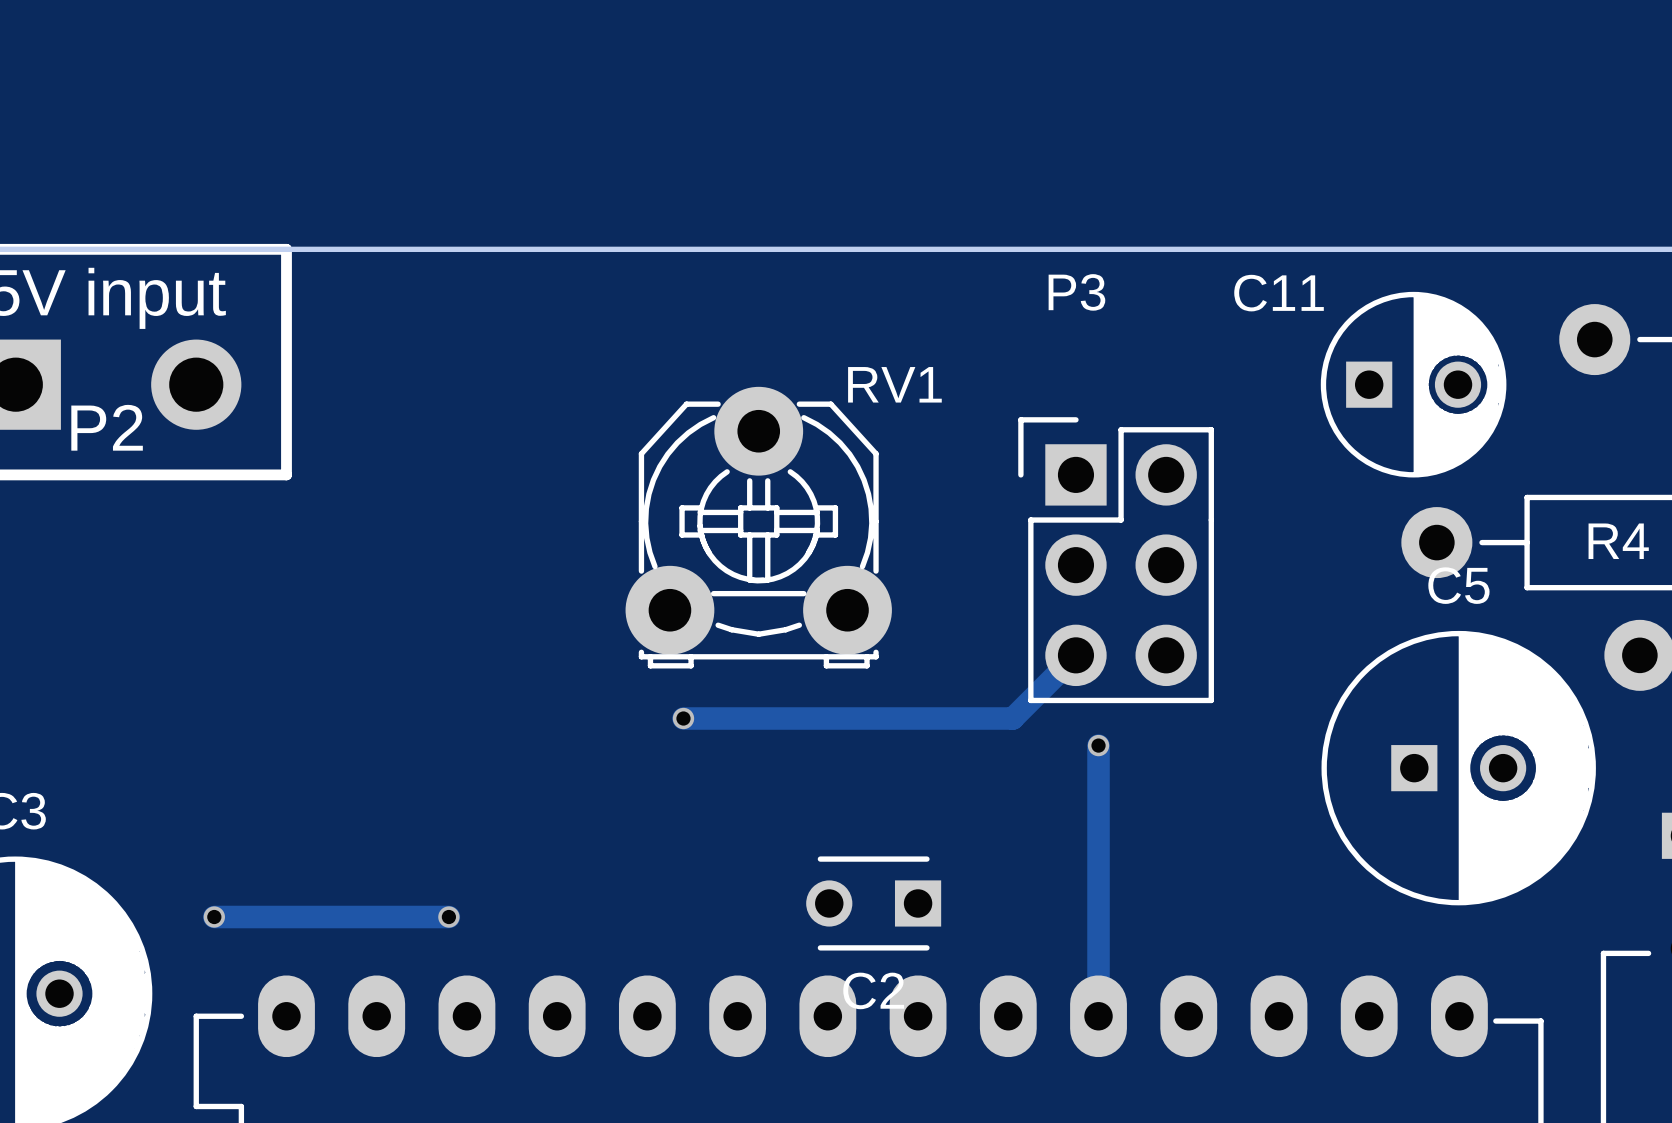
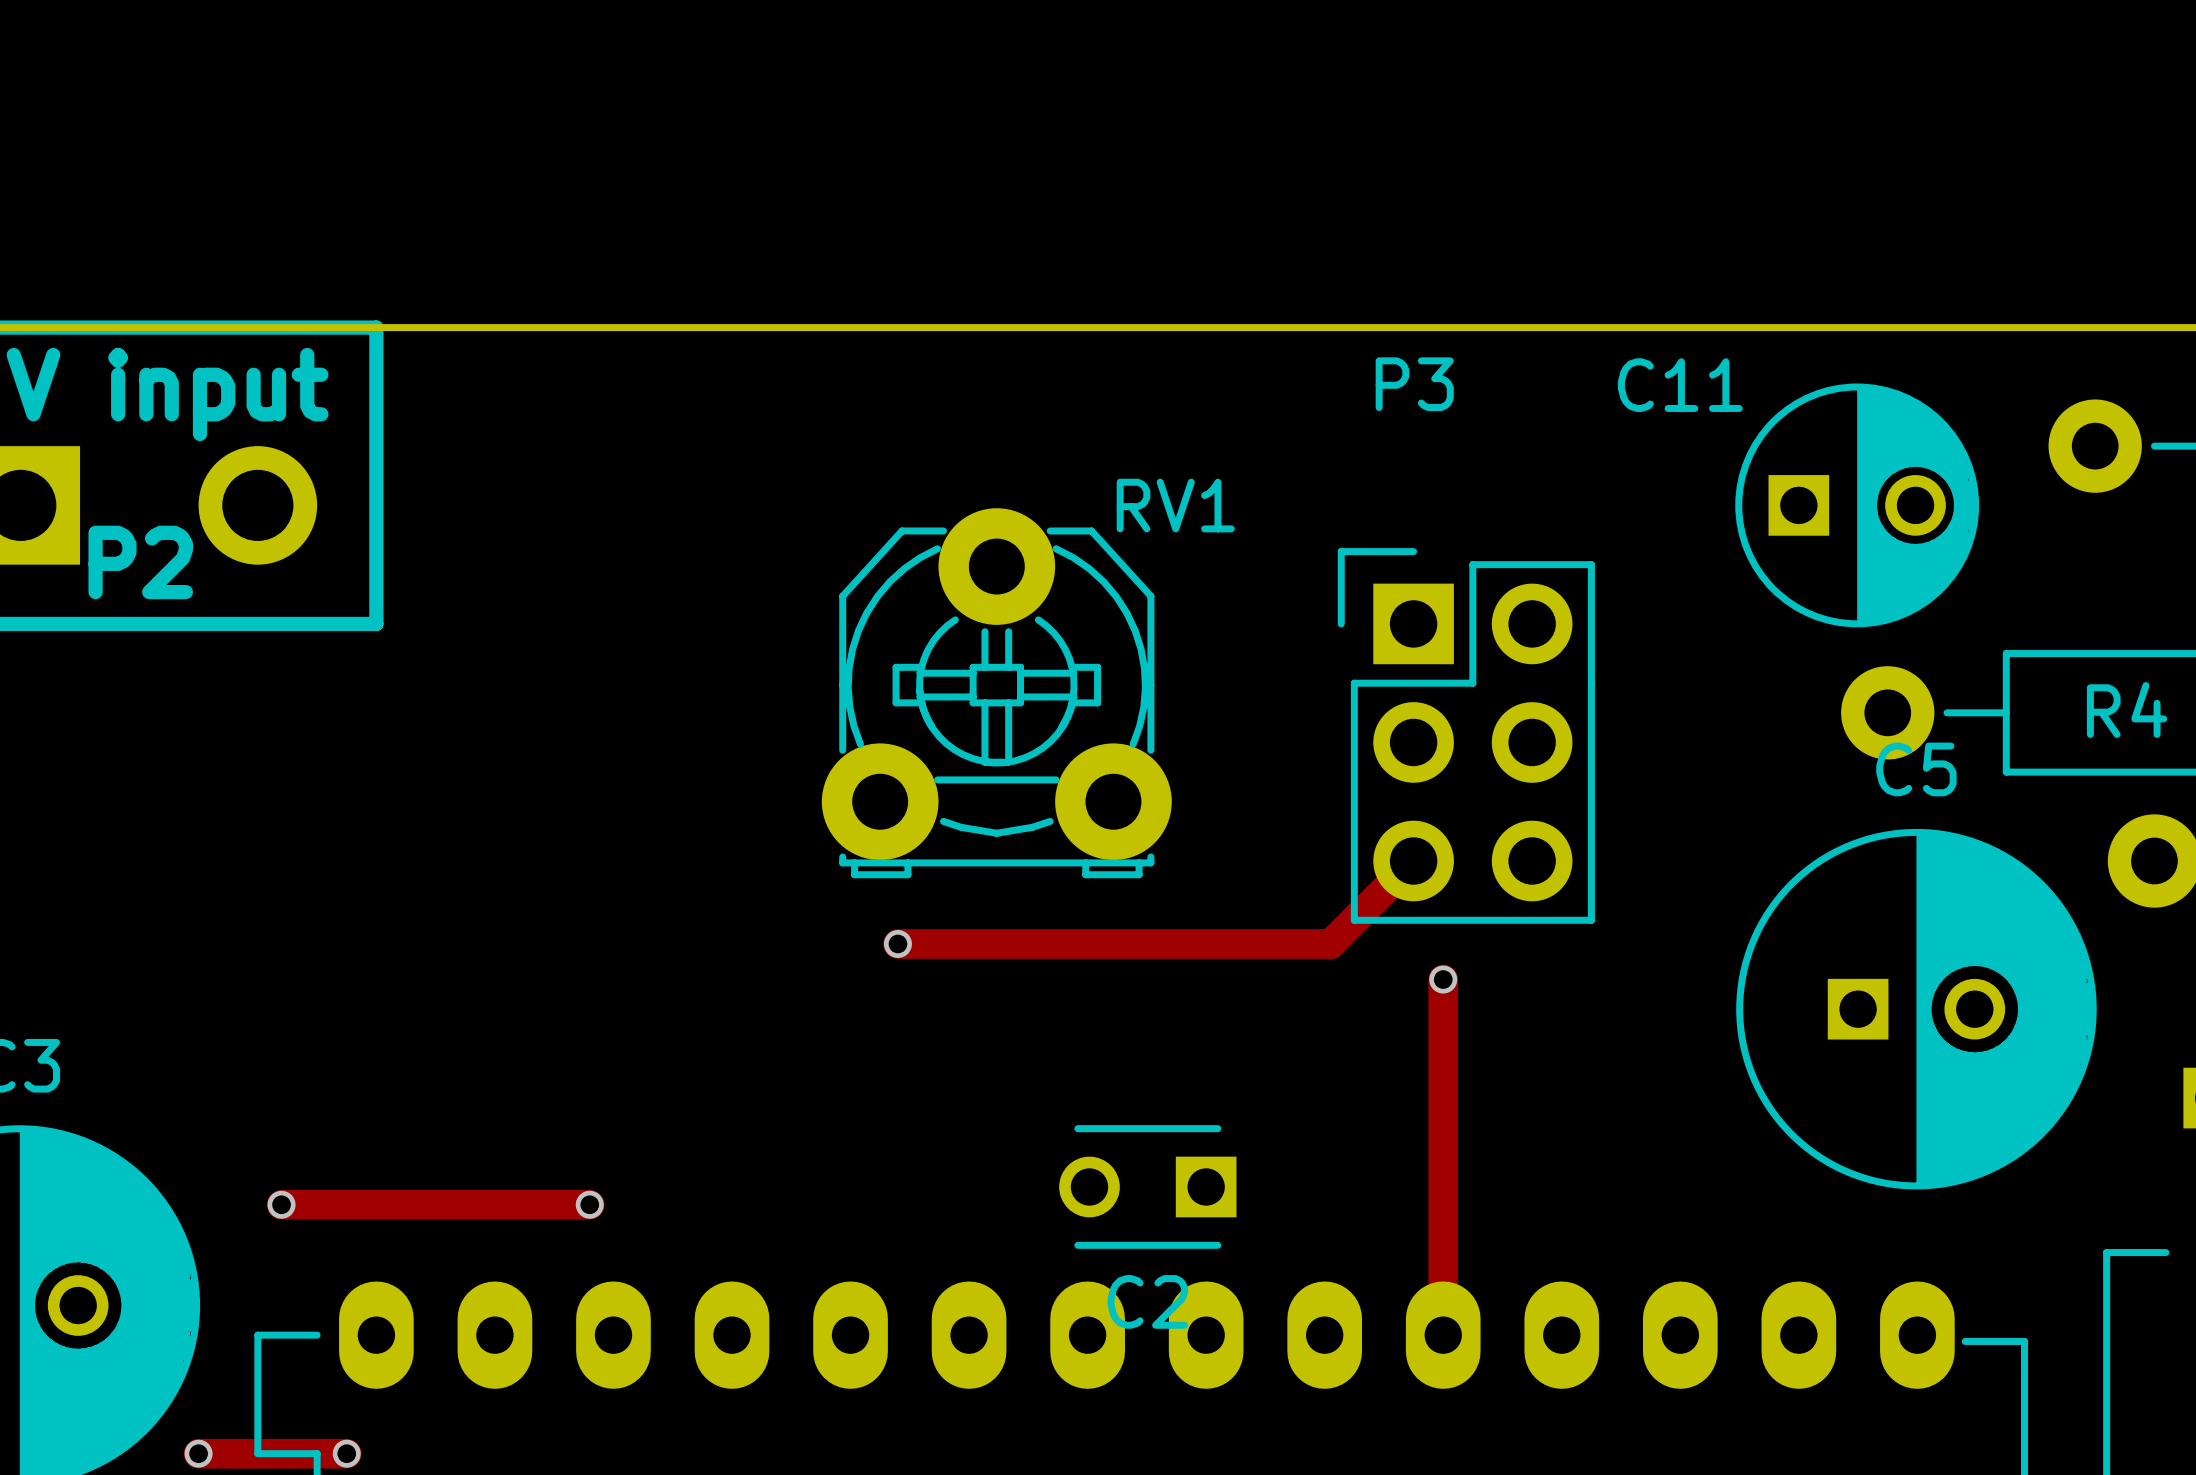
track: none -> (198, 1453) (346, 1453)
via: none -> (198, 1453)
via: none -> (346, 1453)

